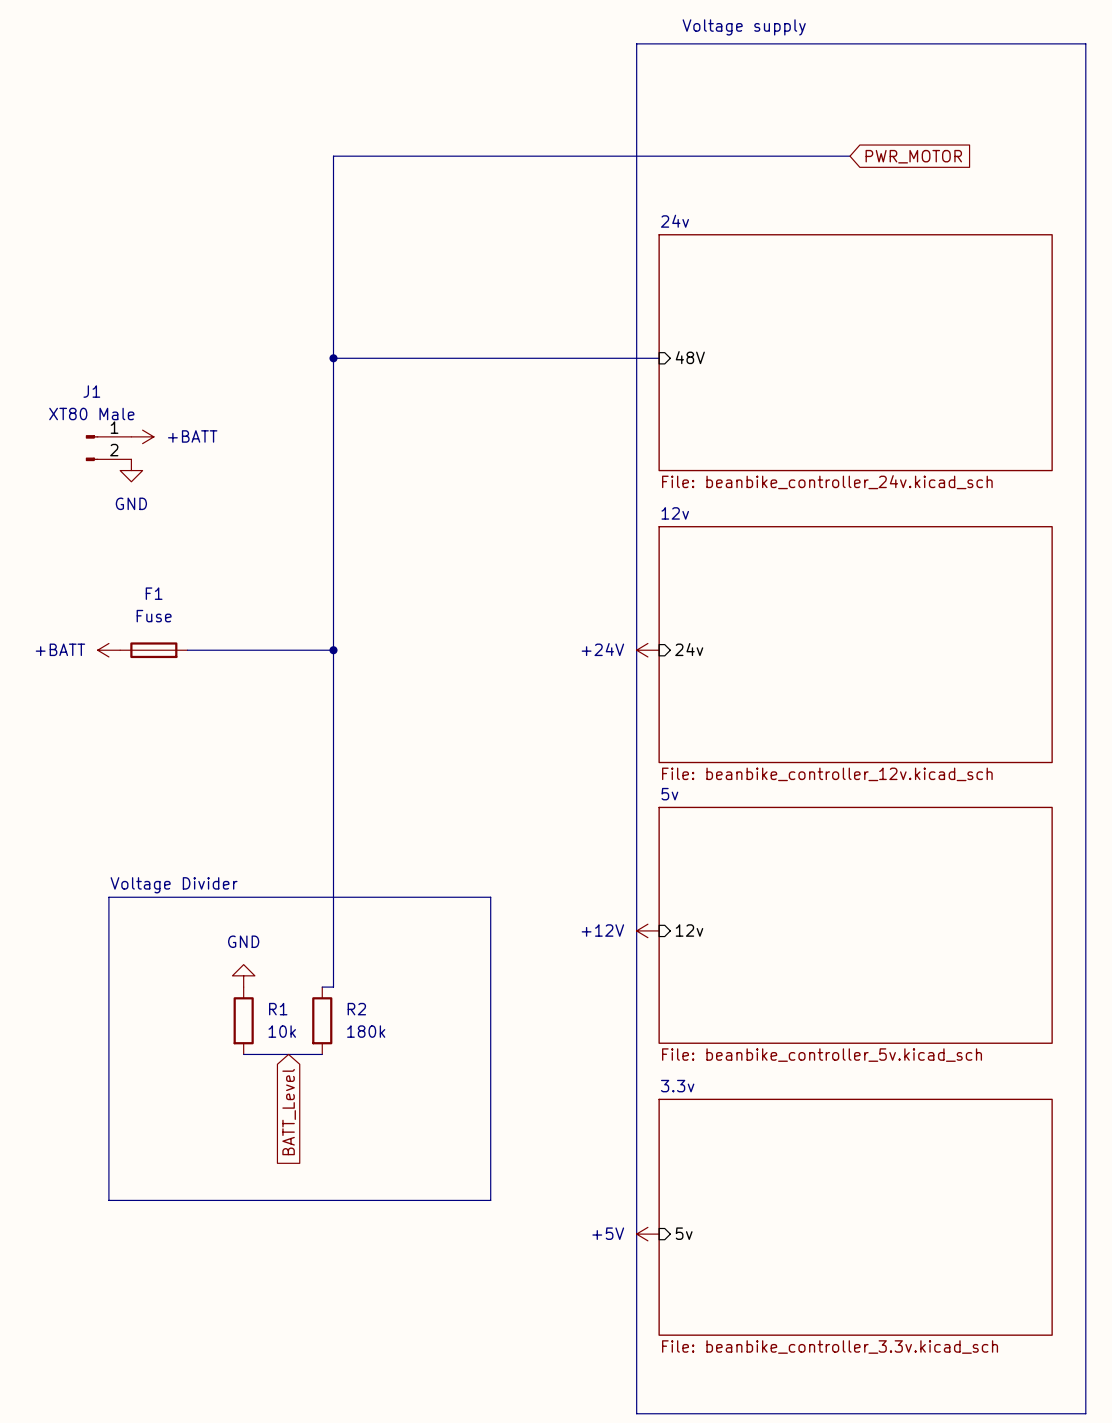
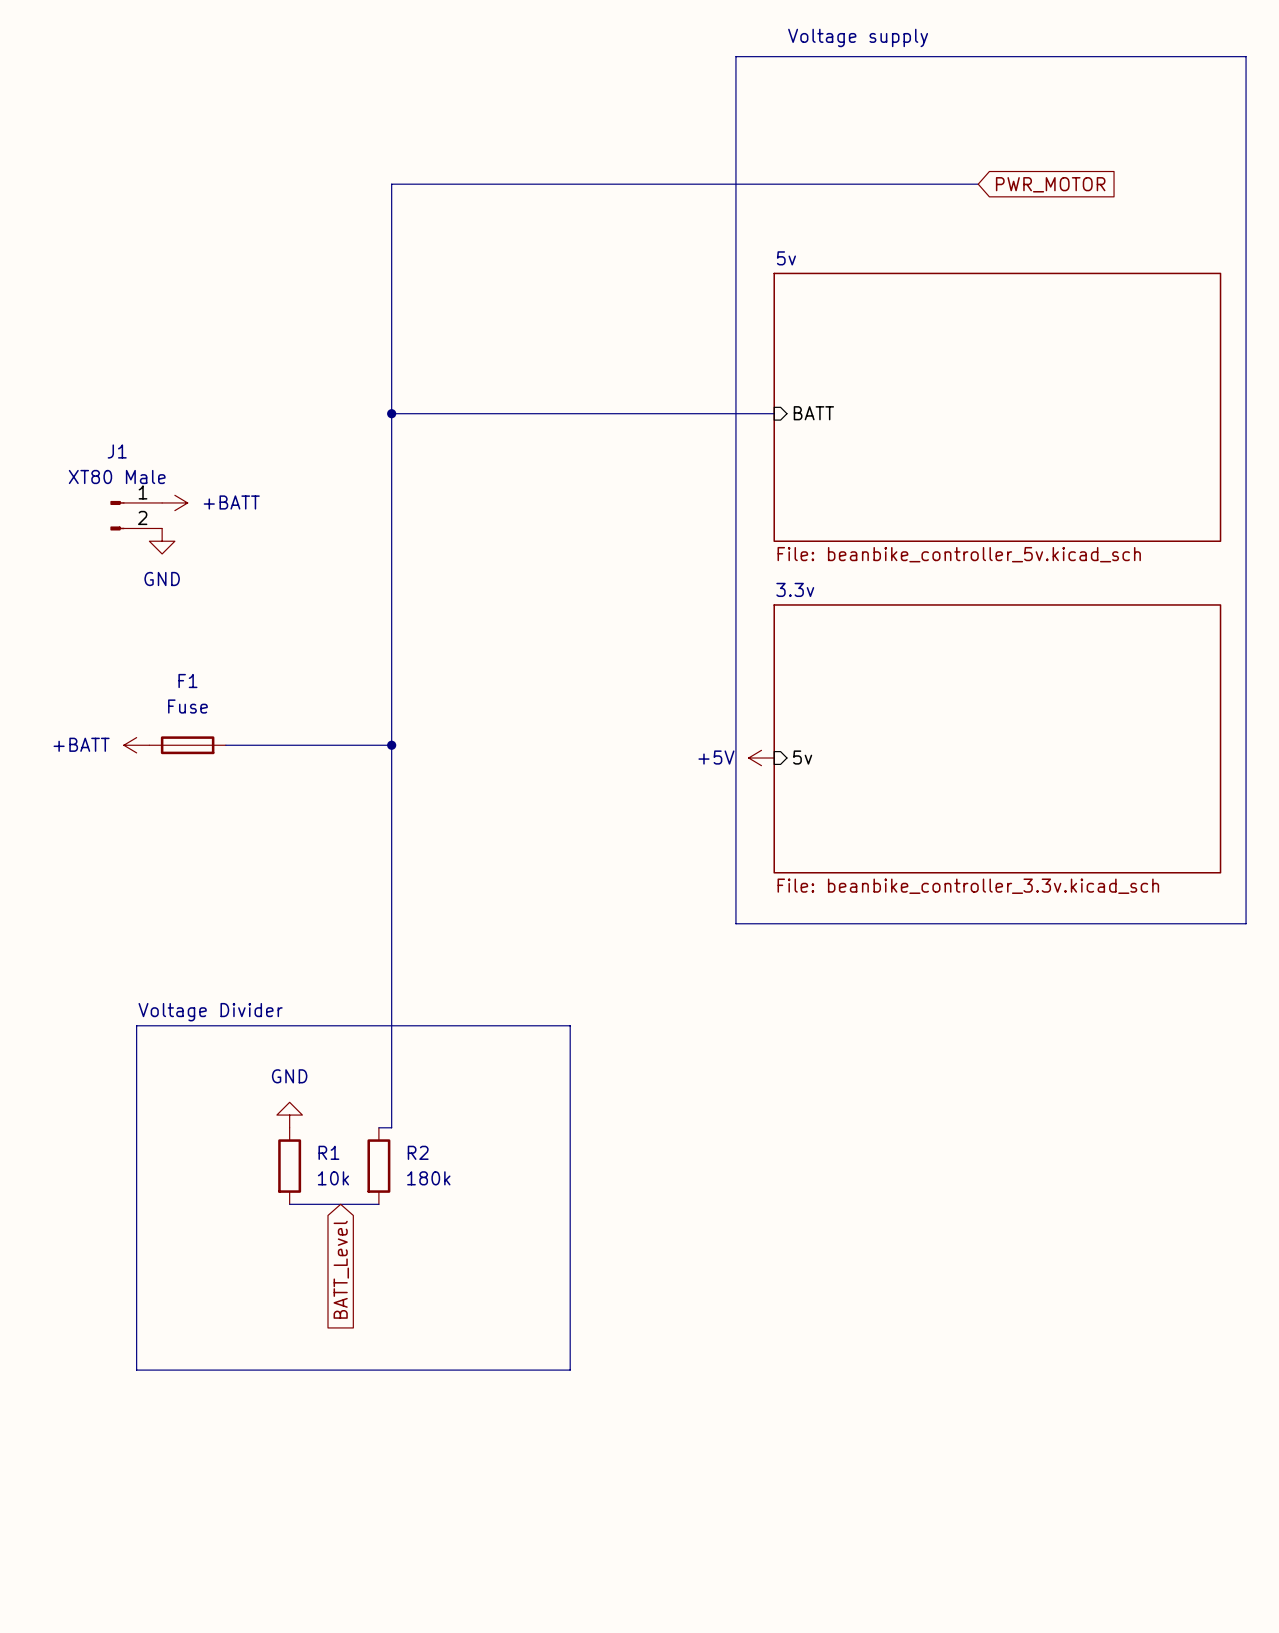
sheet 24v: File: beanbike_controller_24v.kicad_sch (855, 352) -> none
sheet pin: 48V (690, 357) -> none
sheet pin: none -> BATT (813, 413)
wire: none -> (761, 413) (774, 413)
sheet 12v: File: beanbike_controller_12v.kicad_sch (855, 644) -> none
sheet pin: 24v (689, 649) -> none
power symbol: +24V (647, 650) -> none
power symbol: none -> +5V (761, 758)
sheet pin: none -> 5v (802, 757)
line: (636, 807) (636, 1413) (1085, 1413) (1085, 807) -> (735, 923) (1246, 923)
sheet 5v position: (855, 925) -> (997, 407)
power symbol: +12V (647, 930) -> none
sheet pin: 12v (689, 930) -> none
sheet 3.3v position: (855, 1217) -> (997, 738)
sheet pin: 5v (684, 1233) -> none
power symbol: +5V (647, 1234) -> none

